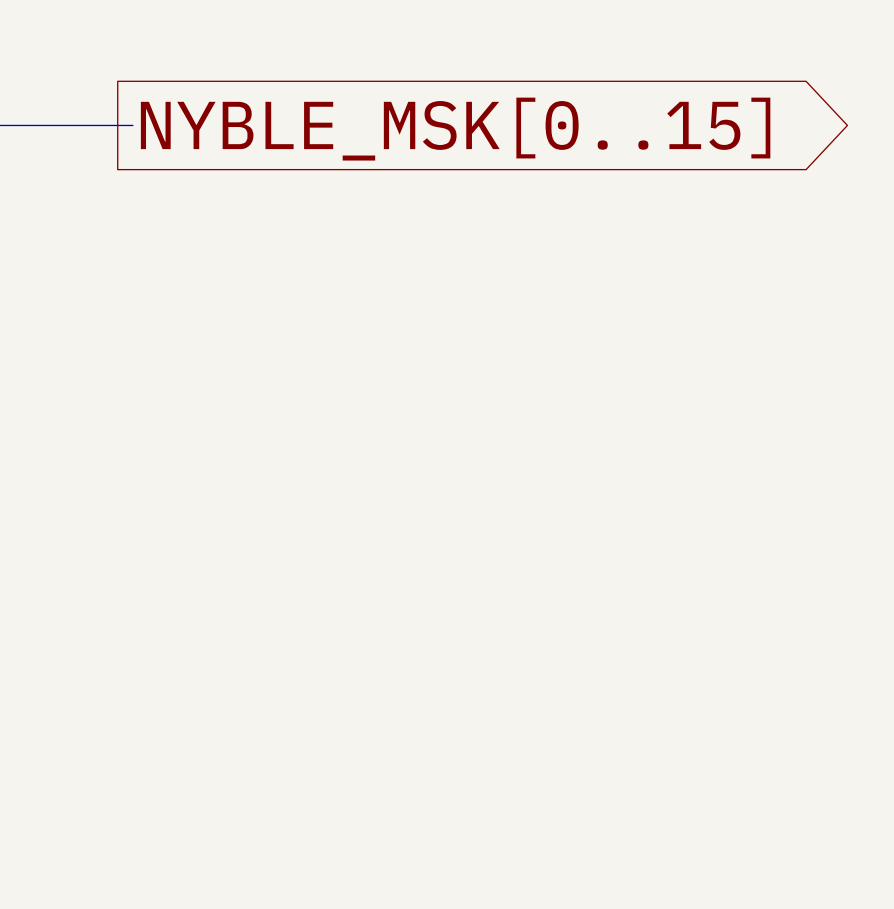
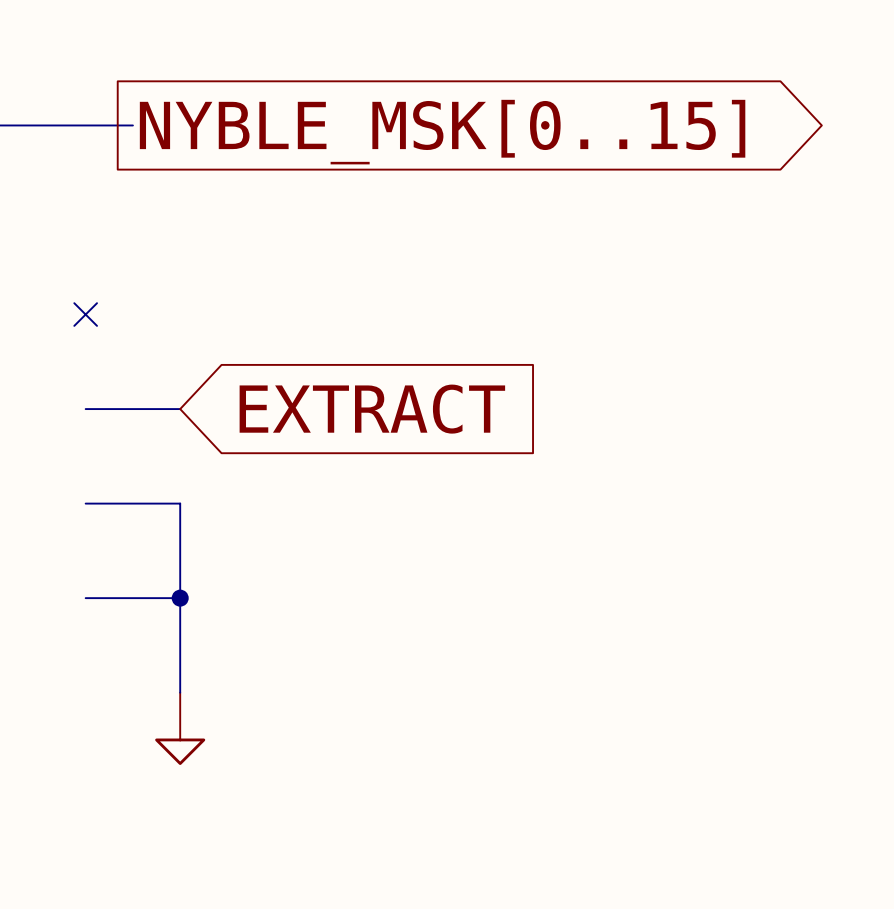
no-connect mark: none -> (85, 314)
wire: none -> (85, 409) (180, 409)
global label: none -> EXTRACT (372, 409)
wire: none -> (85, 503) (180, 503) (180, 692)
wire: none -> (85, 598) (180, 598)
junction: none -> (180, 598)
power symbol: none -> (180, 728)

